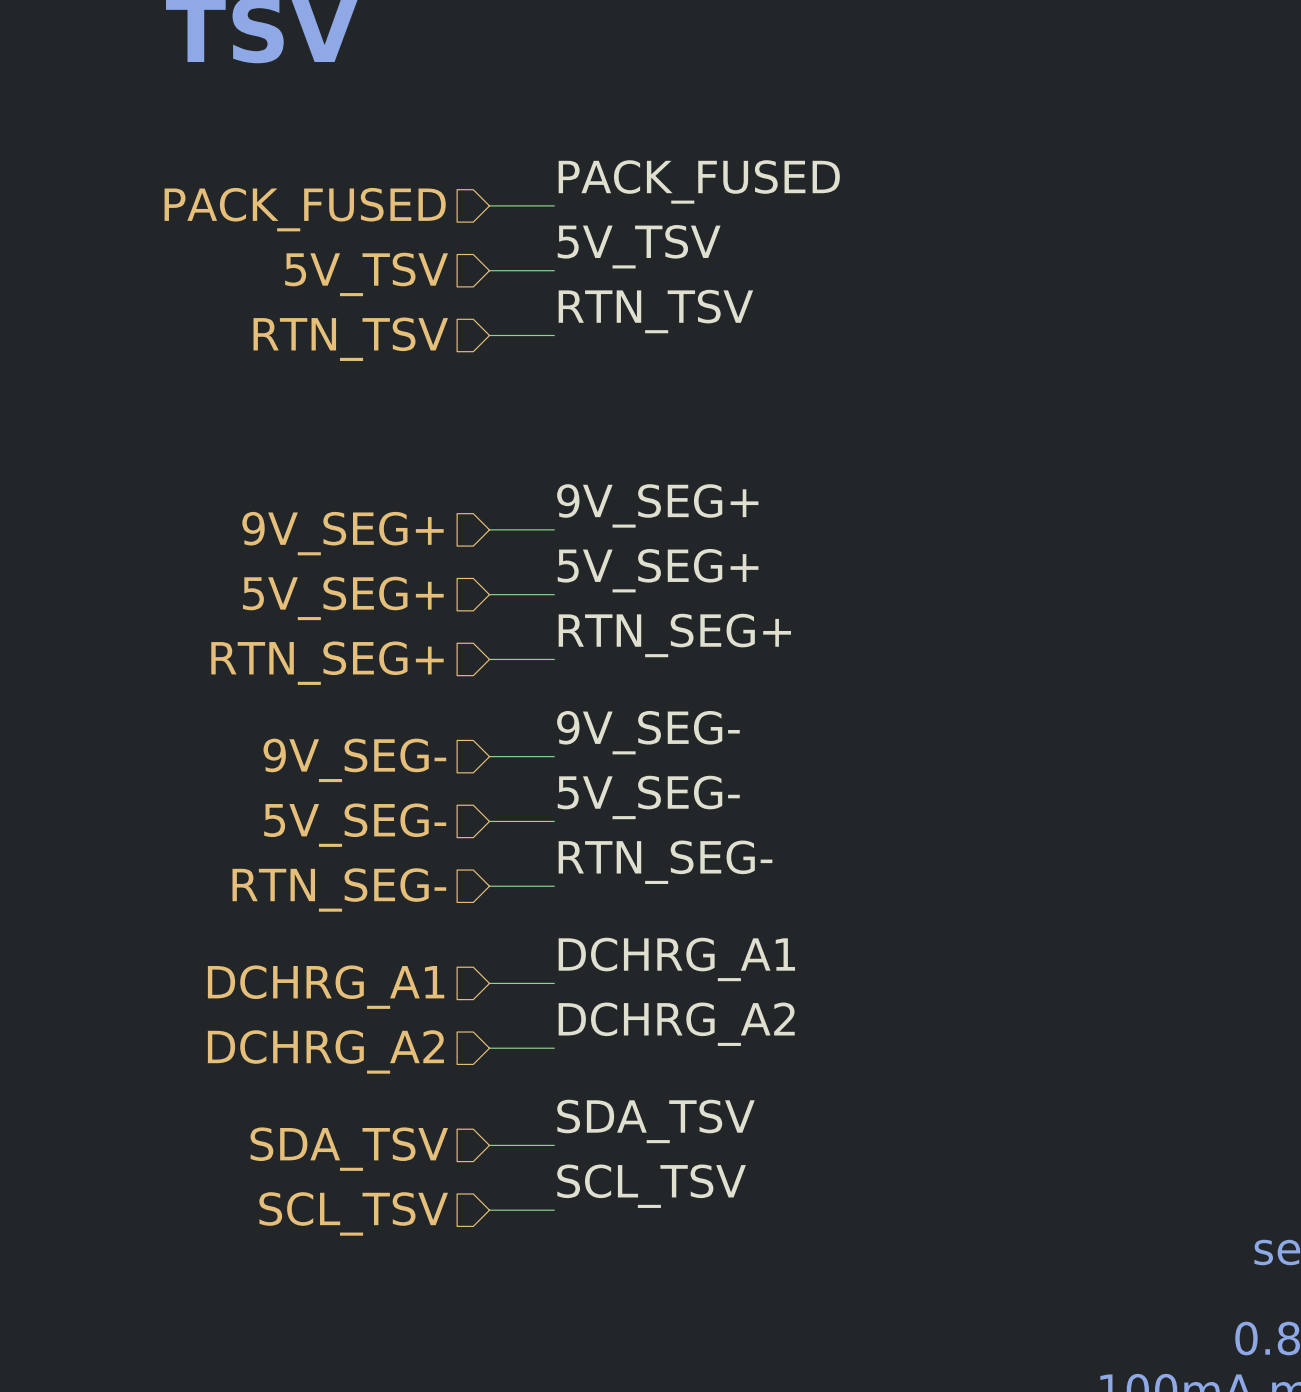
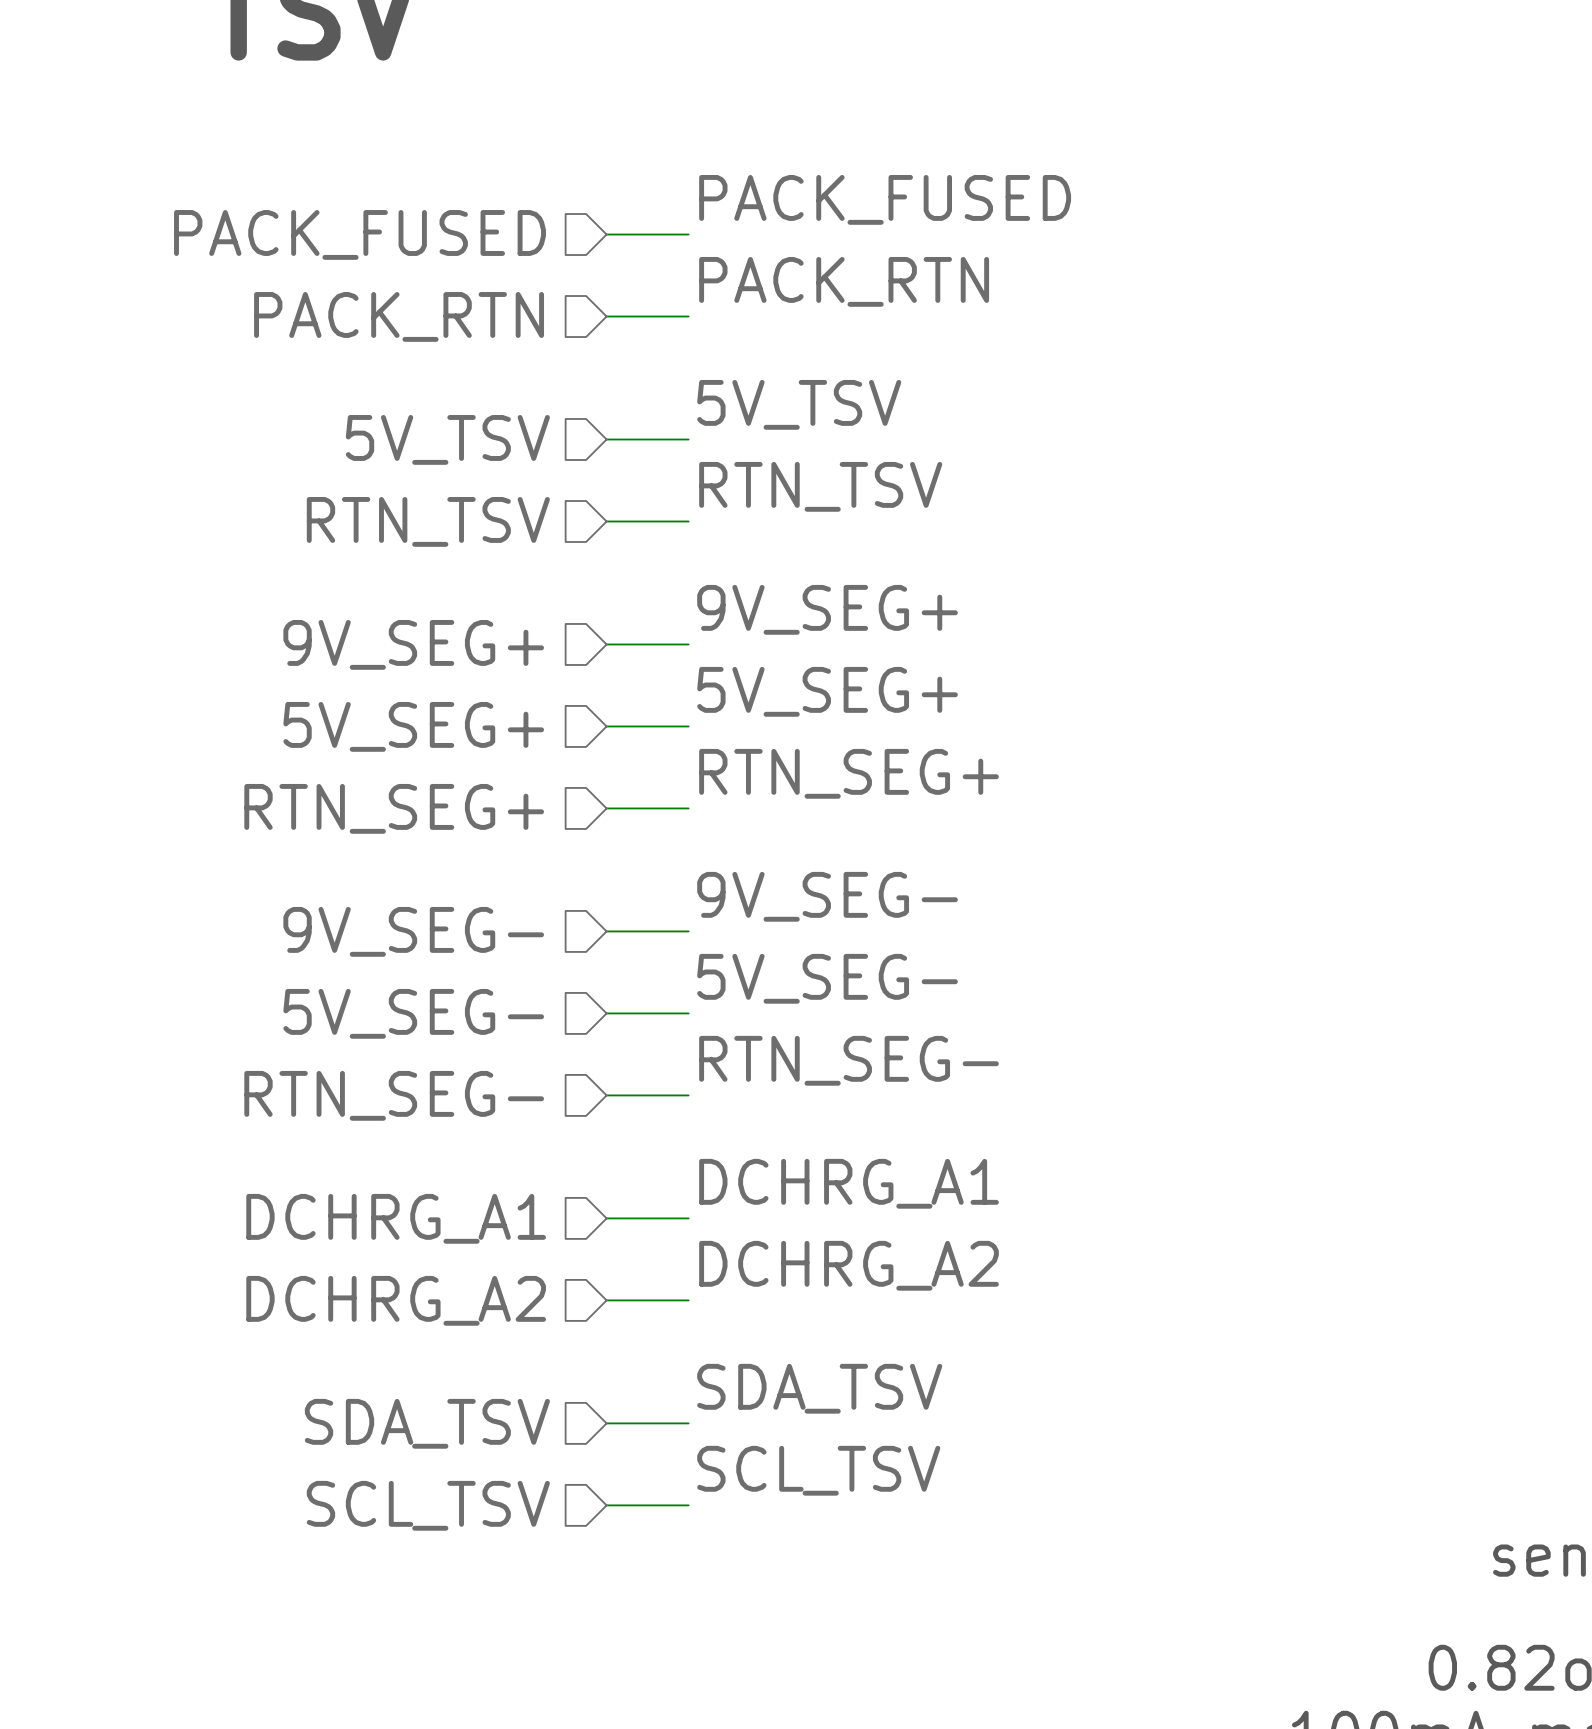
label: 5V_TSV (639, 246) -> PACK_RTN (844, 281)
hierarchical label: 5V_TSV (366, 274) -> PACK_RTN (399, 316)
label position: RTN_TSV (655, 311) -> RTN_TSV (820, 486)
wire: (489, 335) (554, 335) -> (606, 439) (688, 439)
hierarchical label position: RTN_TSV (350, 339) -> RTN_TSV (428, 521)
label: none -> 5V_TSV (799, 404)
hierarchical label: none -> 5V_TSV (447, 439)
wire: none -> (606, 521) (688, 521)

